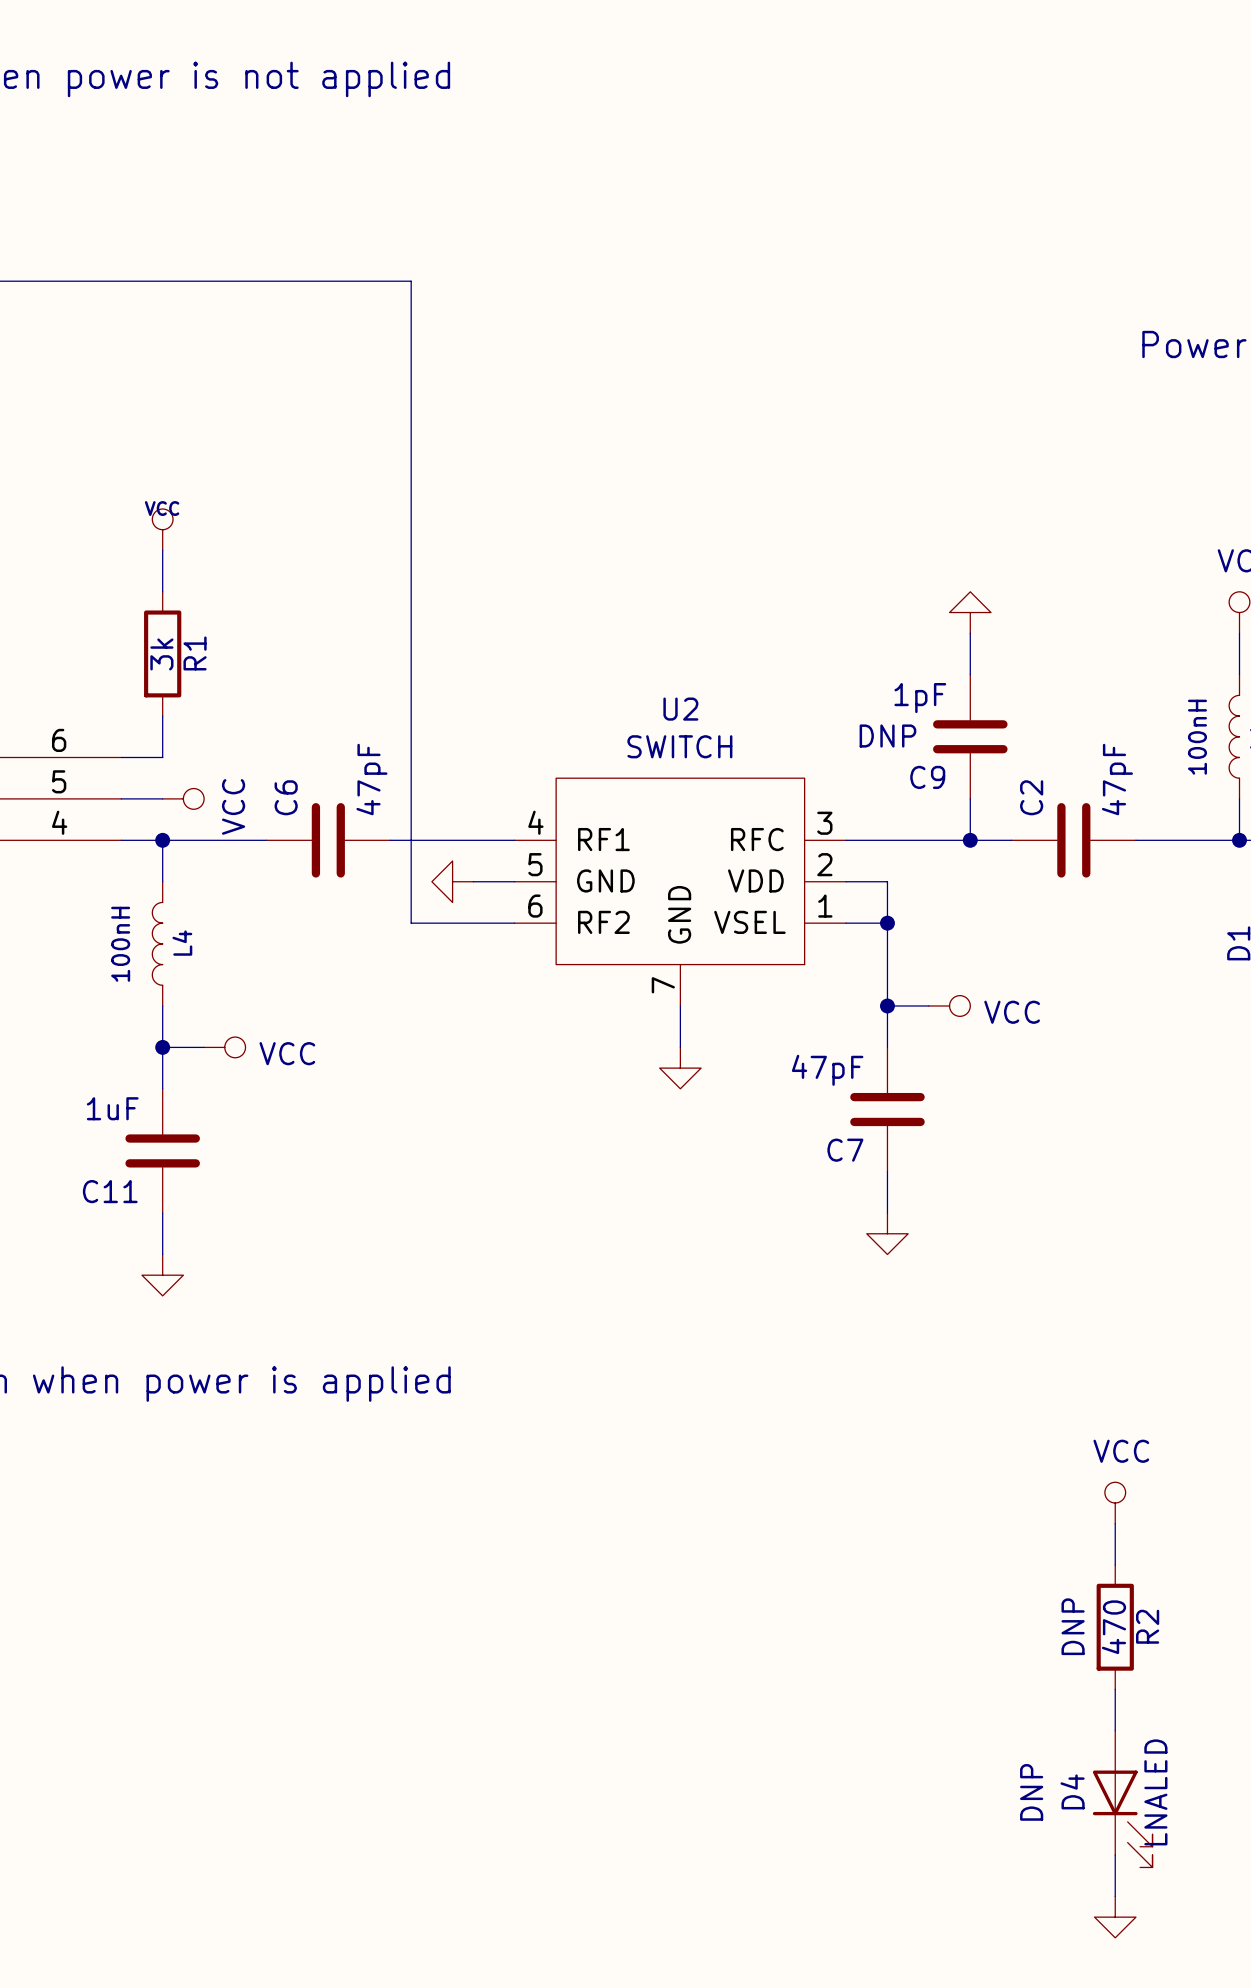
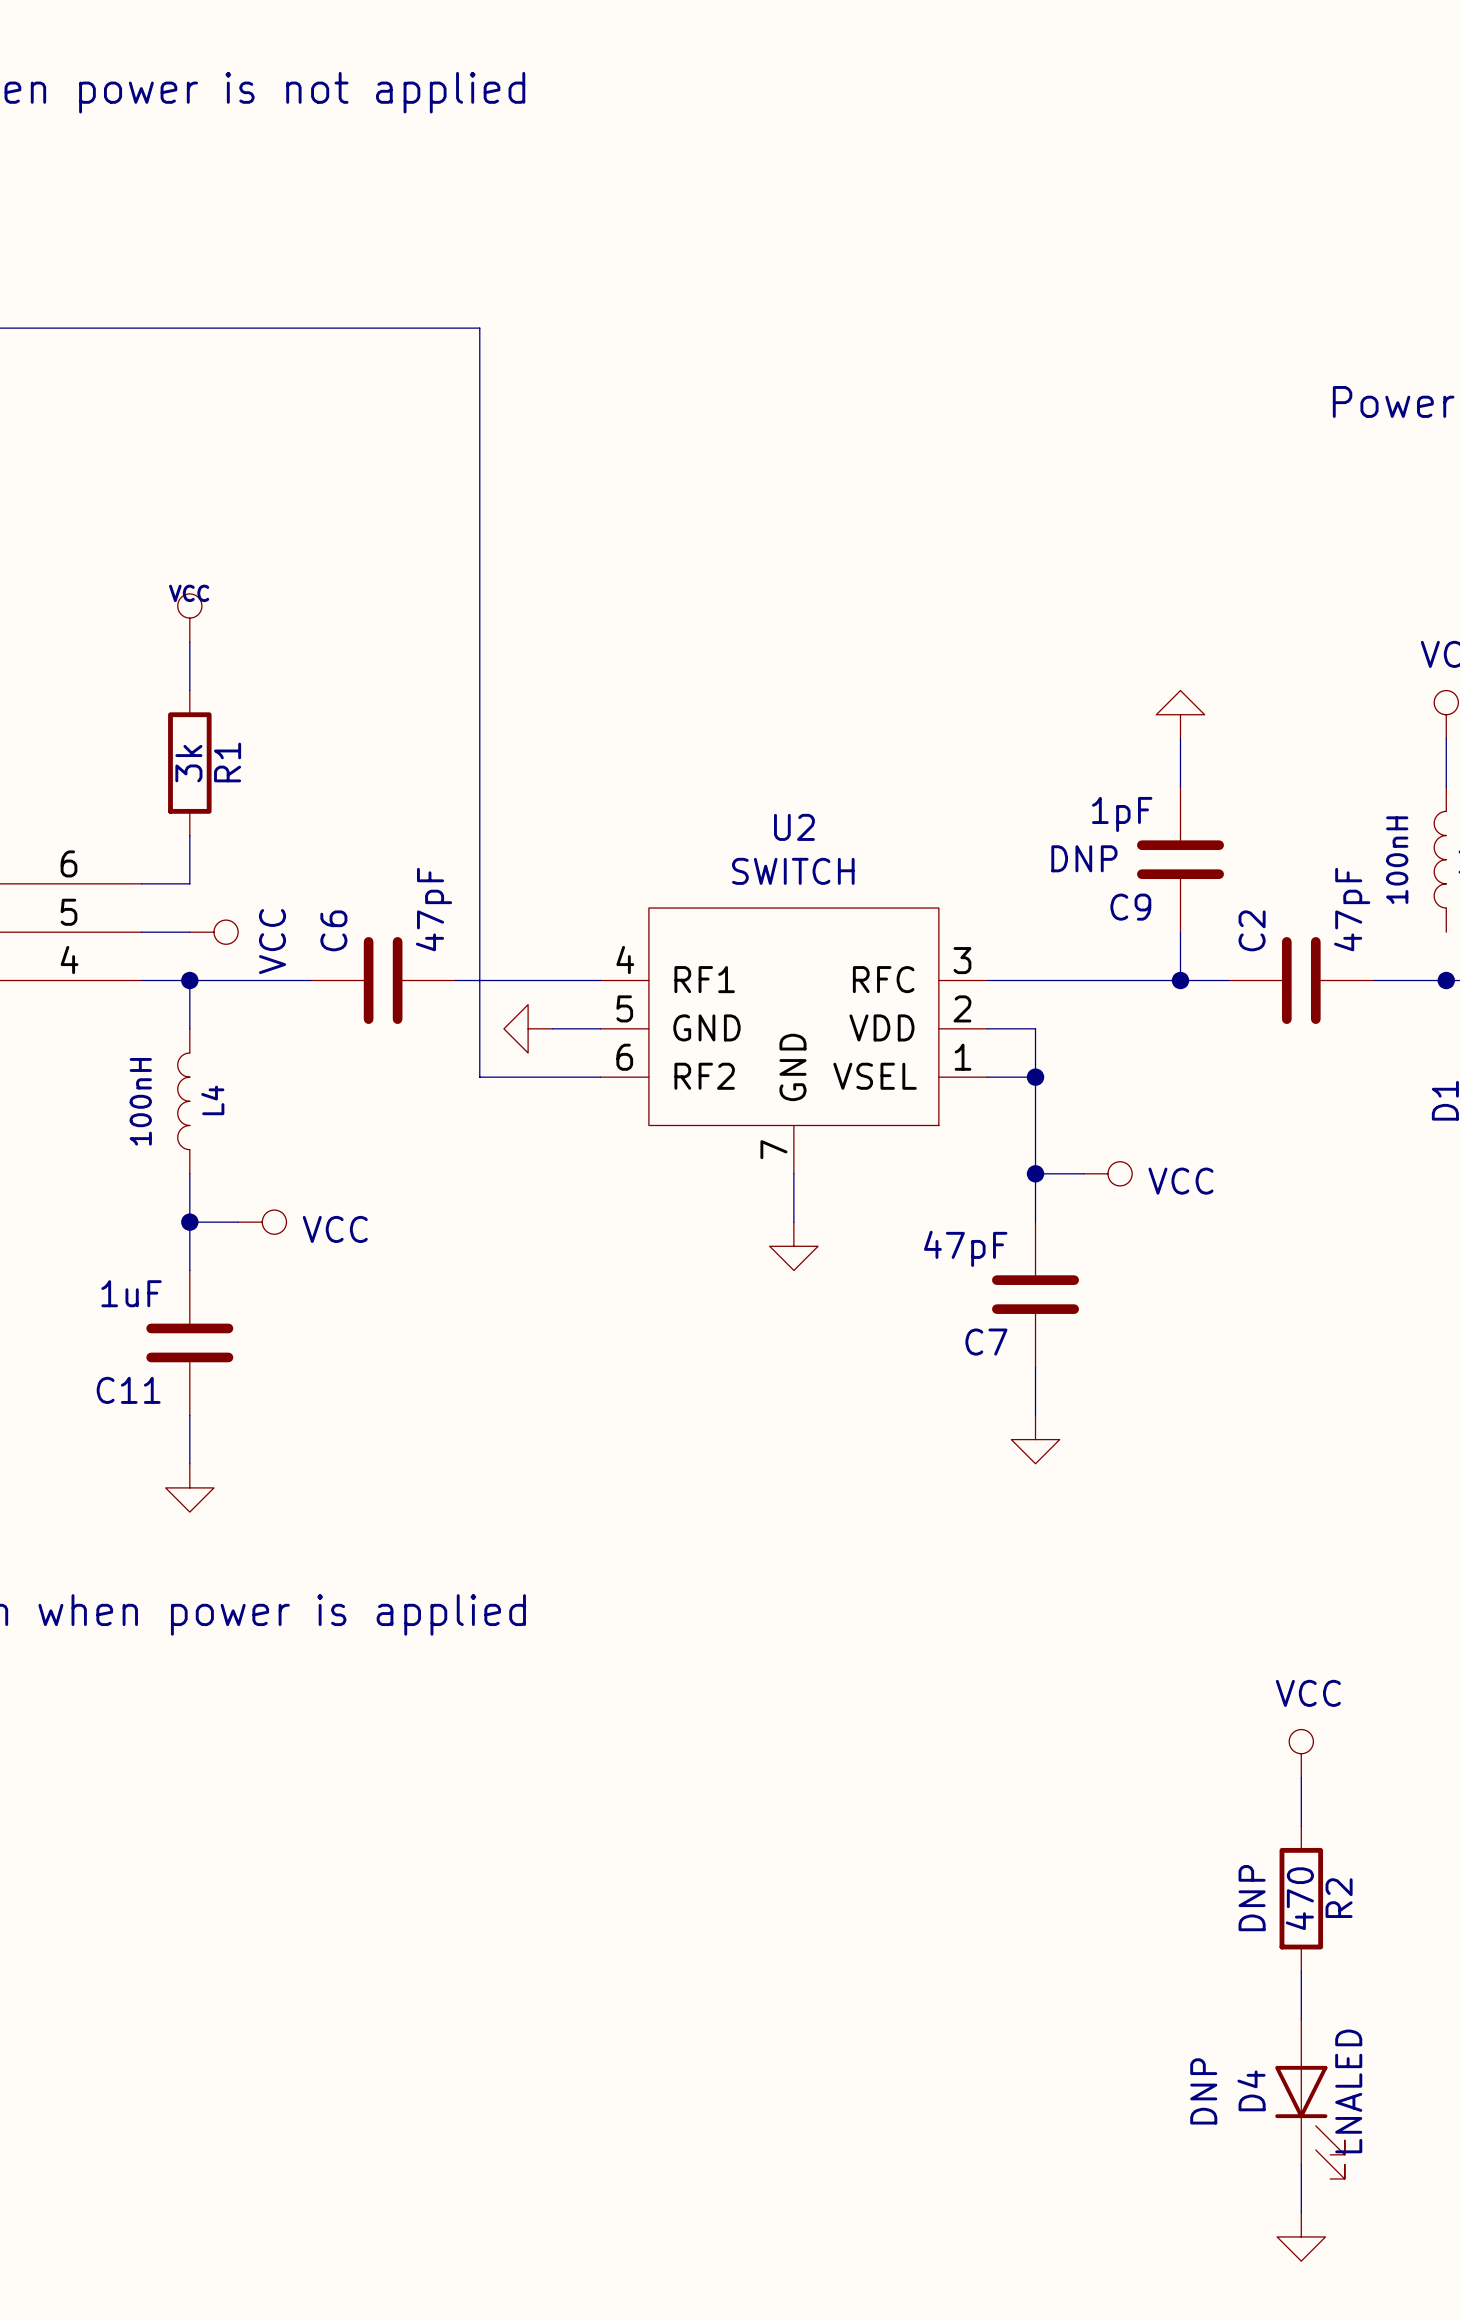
power symbol position: (970, 612) -> (1180, 714)
wire: (970, 633) (970, 674) -> (1180, 738) (1180, 787)
C9 position: (970, 736) -> (1180, 859)
wire: (970, 798) (970, 840) -> none
wire: none -> (1180, 932) (1180, 980) (1228, 980)
wire: (1239, 798) (1239, 840) -> none
junction position: (970, 840) -> (1180, 980)
C2 position: (1073, 840) -> (1301, 980)

